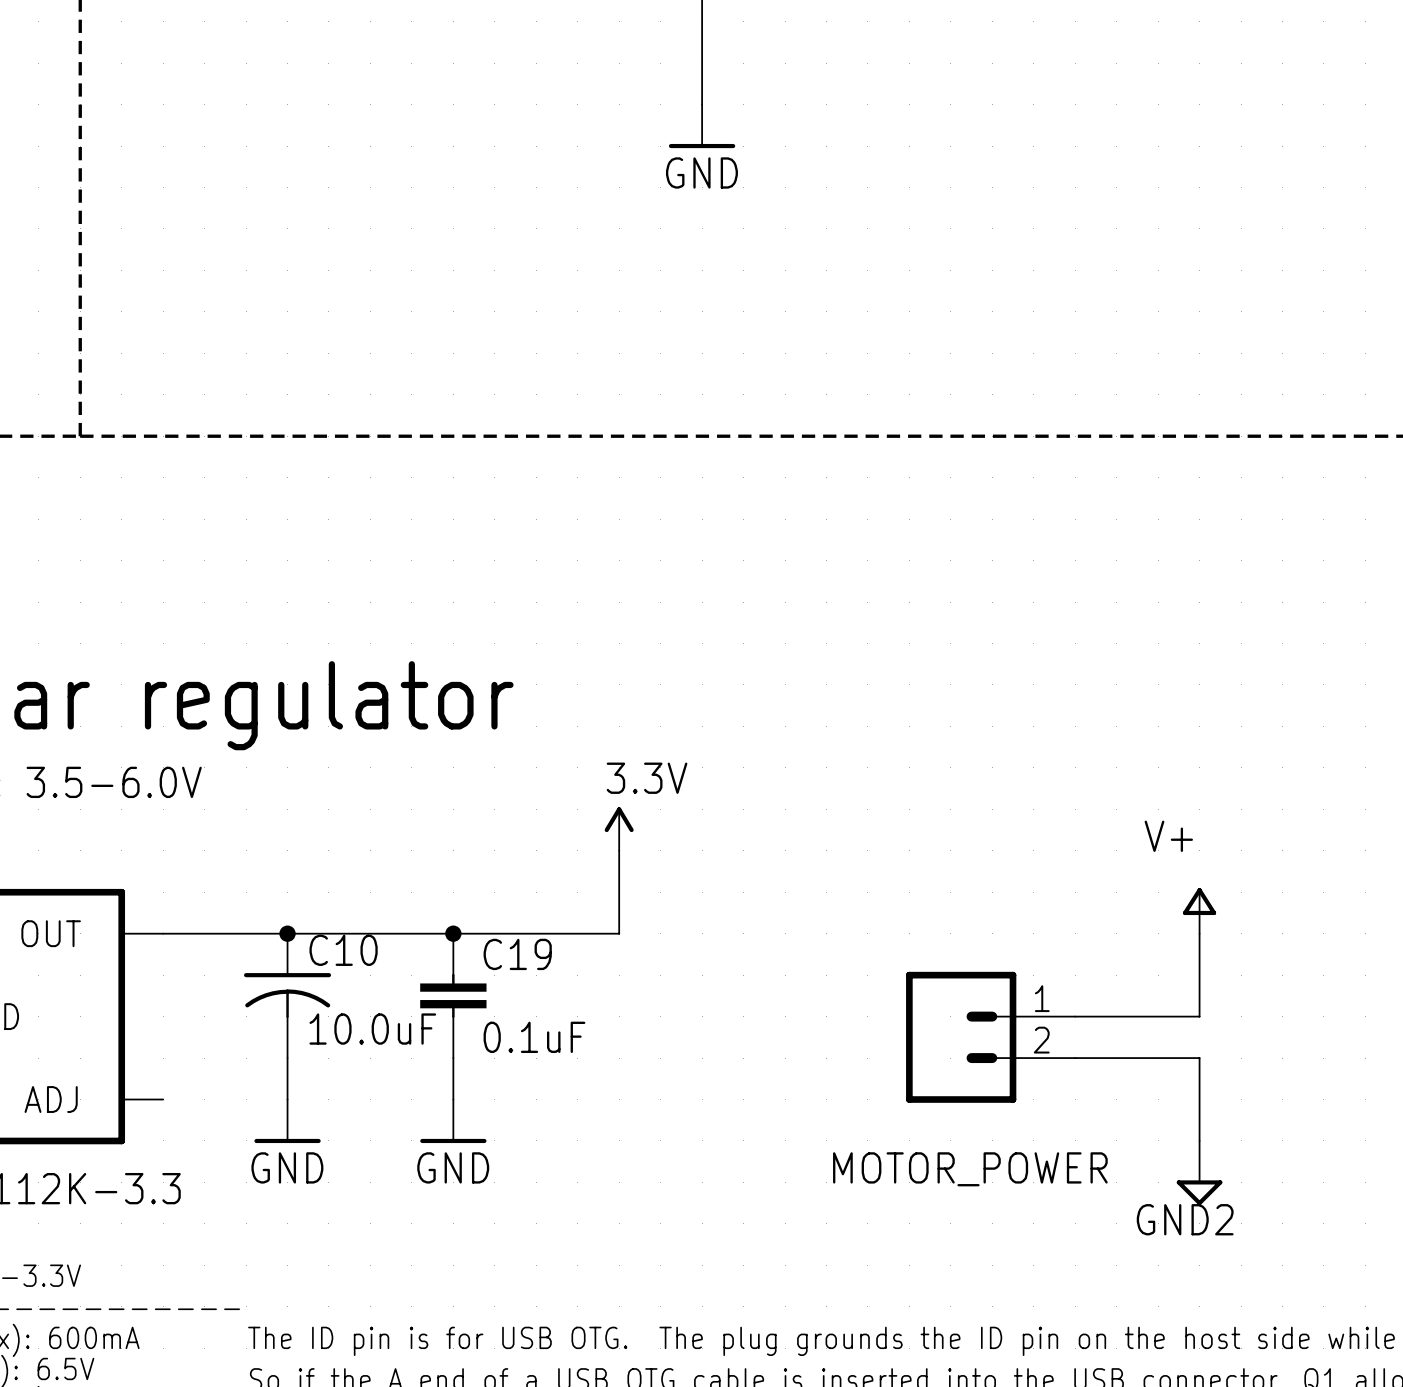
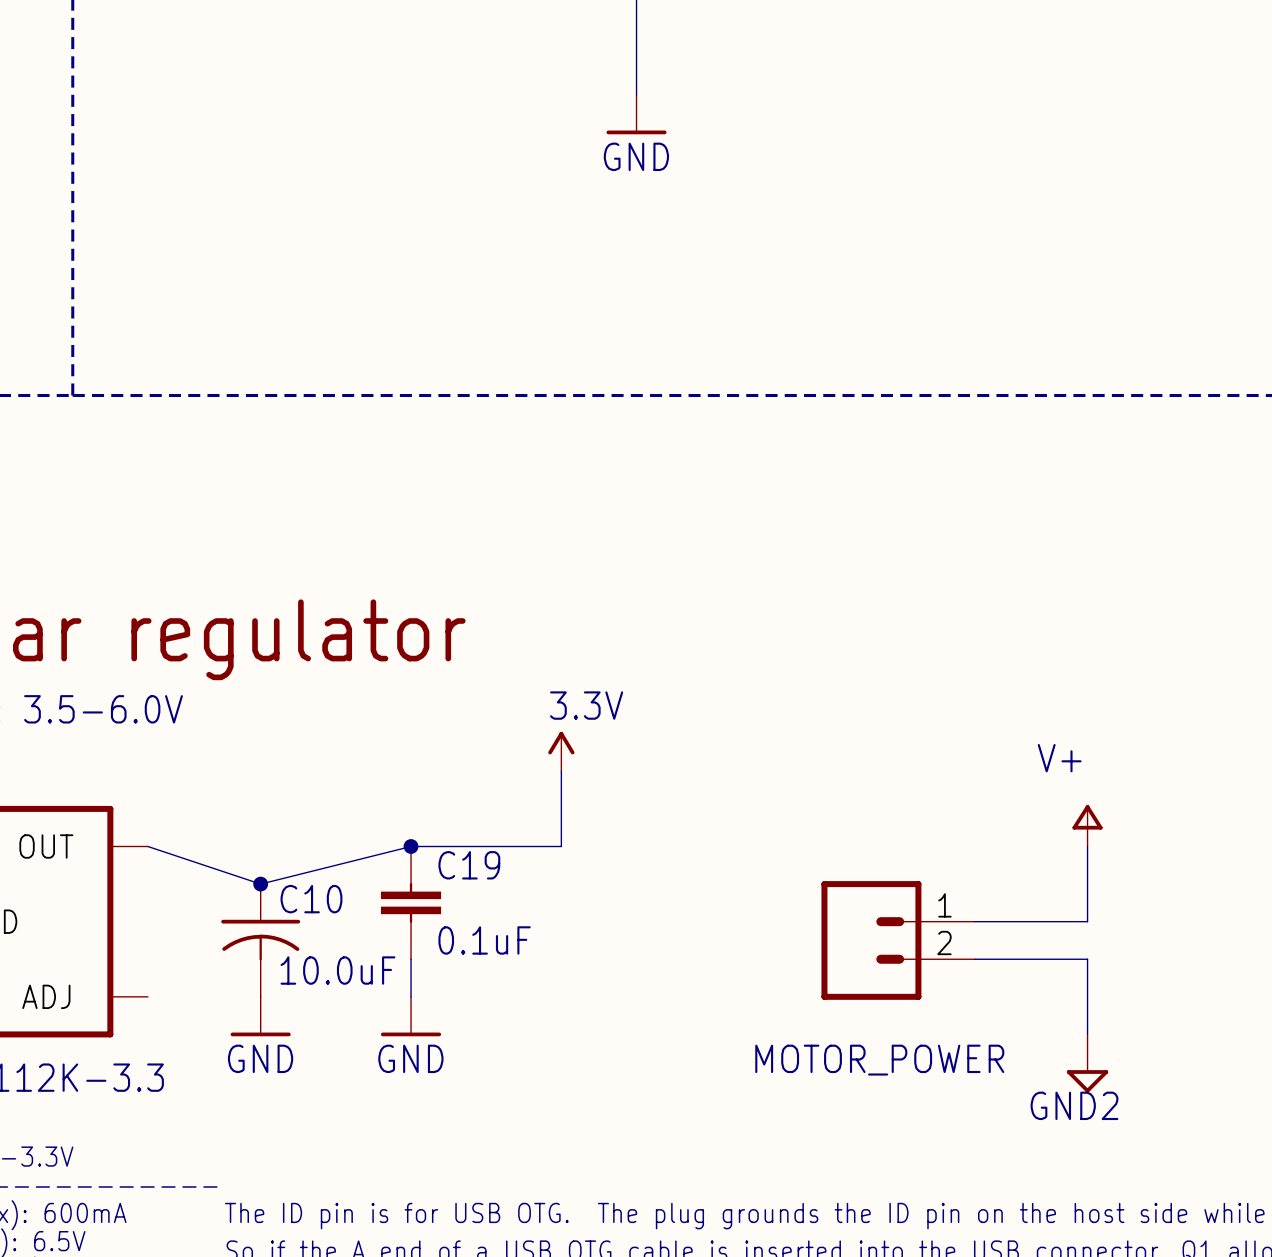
wire: (163, 933) (453, 933) -> (147, 846) (260, 884) (411, 846)
junction position: (287, 933) -> (260, 884)
C10 position: (287, 995) -> (260, 940)

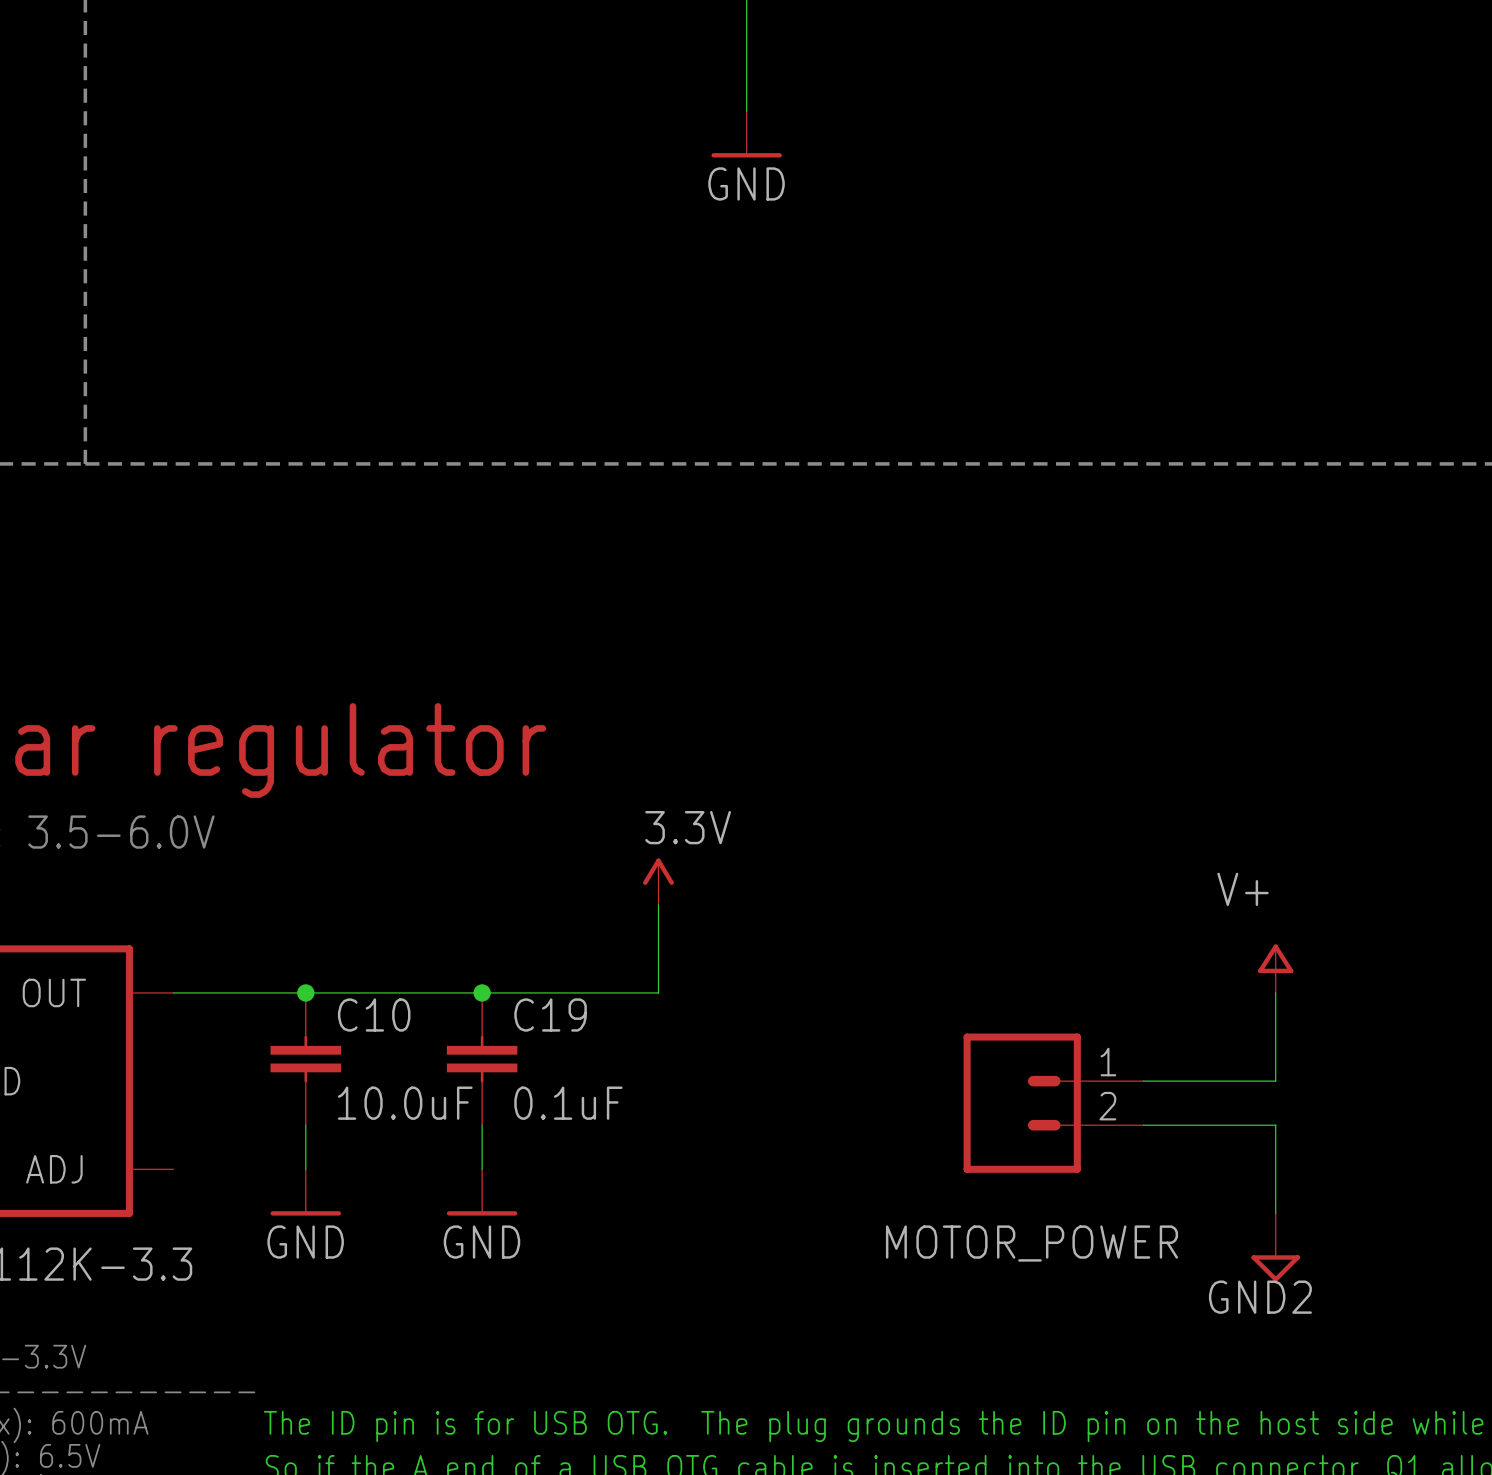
wire: (147, 846) (260, 884) (411, 846) -> (173, 992) (482, 992)
C10 symbol: [221, 884, 301, 997] -> [270, 992, 342, 1126]
junction position: (260, 884) -> (305, 992)

